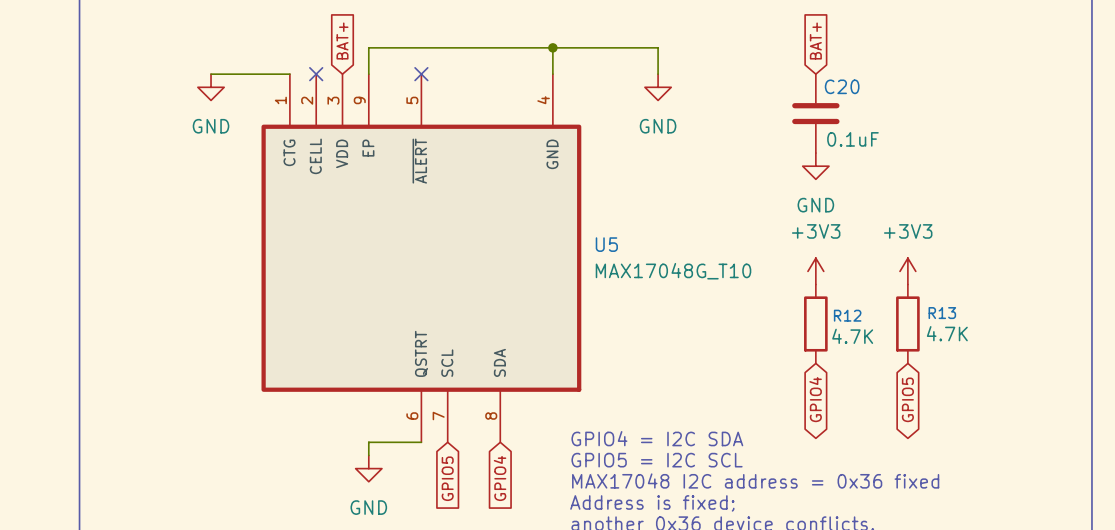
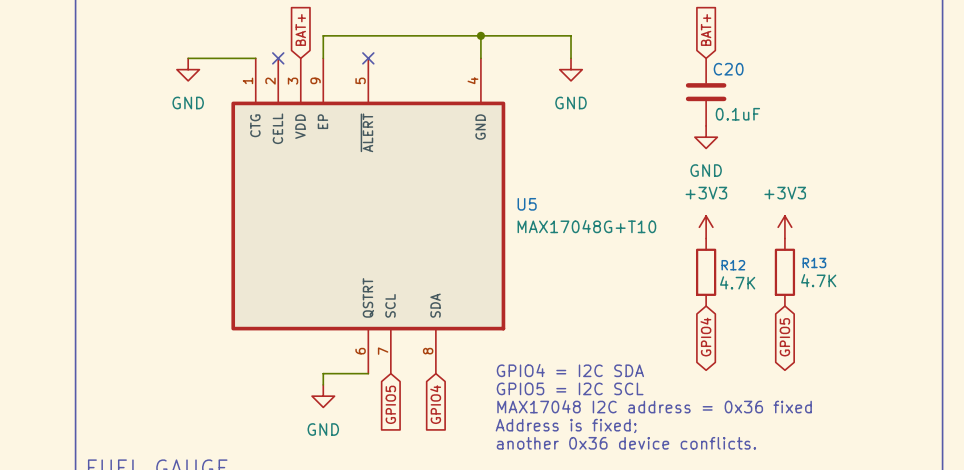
U5 value: MAX17048G_T10 (673, 271) -> MAX17048G+T10 (586, 226)

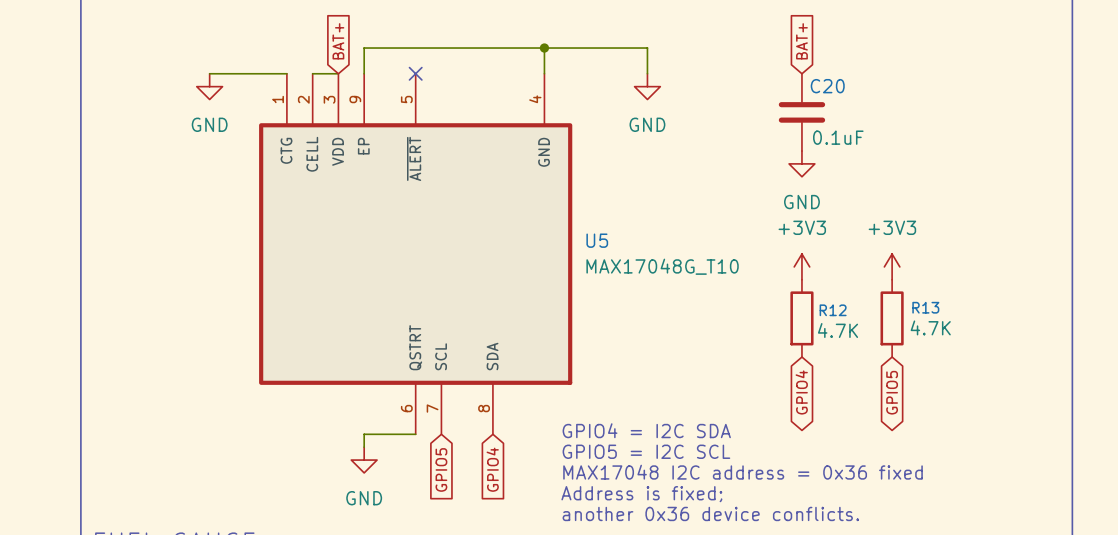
wire: none -> (312, 73) (338, 73)
no-connect mark: (278, 58) -> none
U5 value: MAX17048G+T10 (586, 226) -> MAX17048G_T10 (662, 266)

